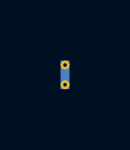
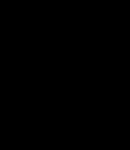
part: (65, 74) -> none

